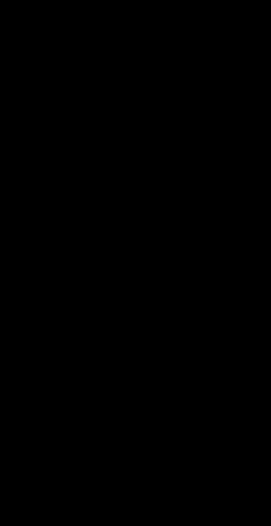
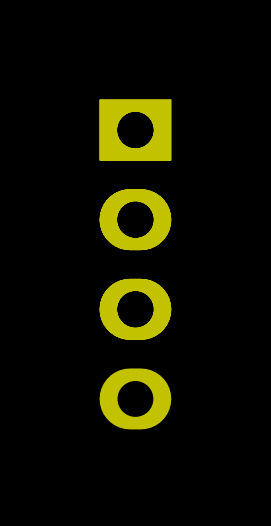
part: none -> (135, 219)
part: none -> (135, 264)

